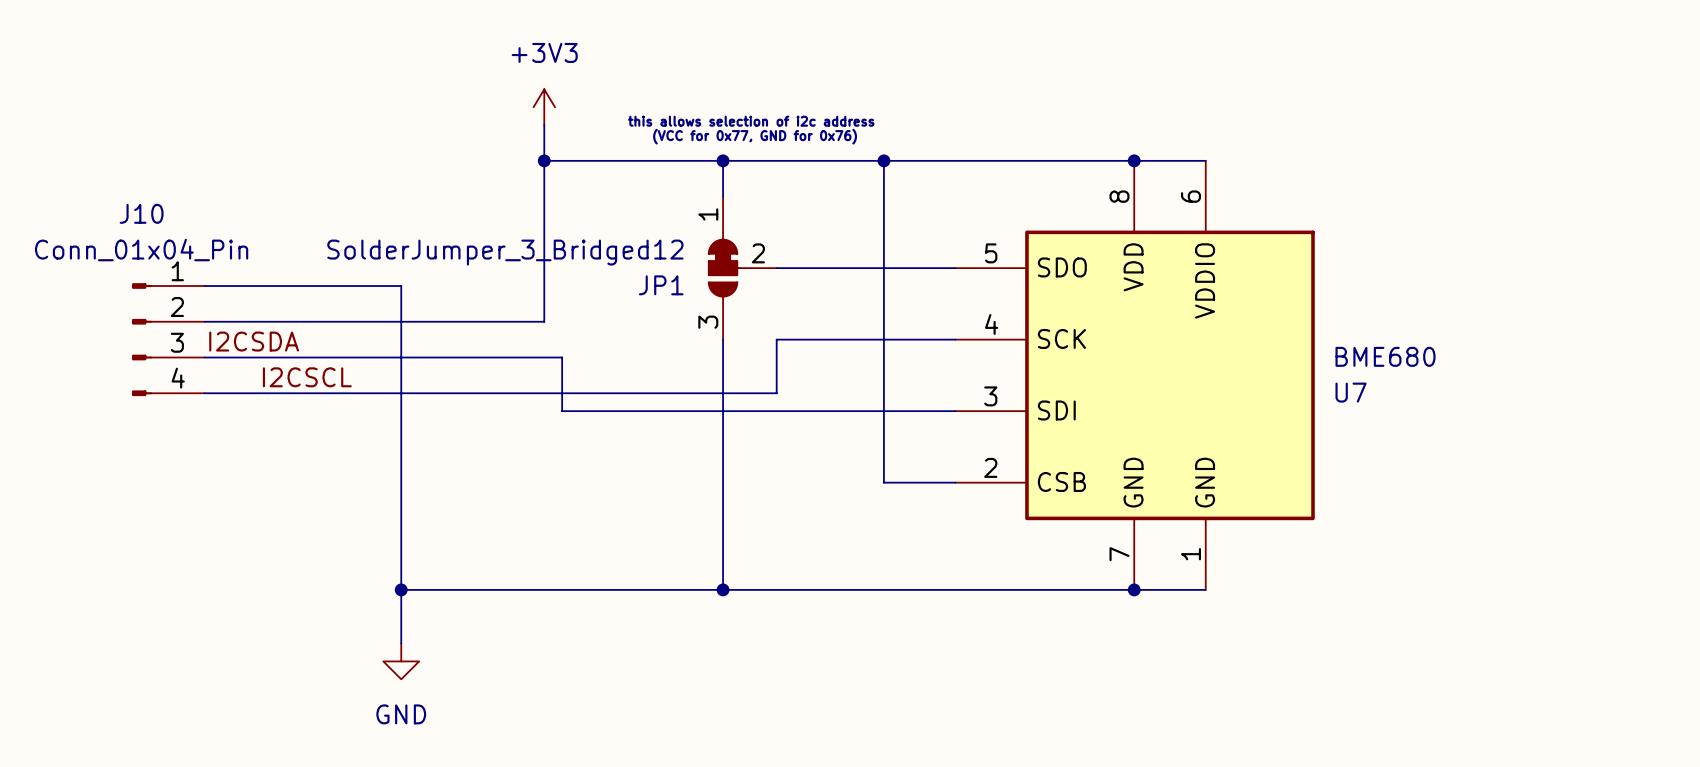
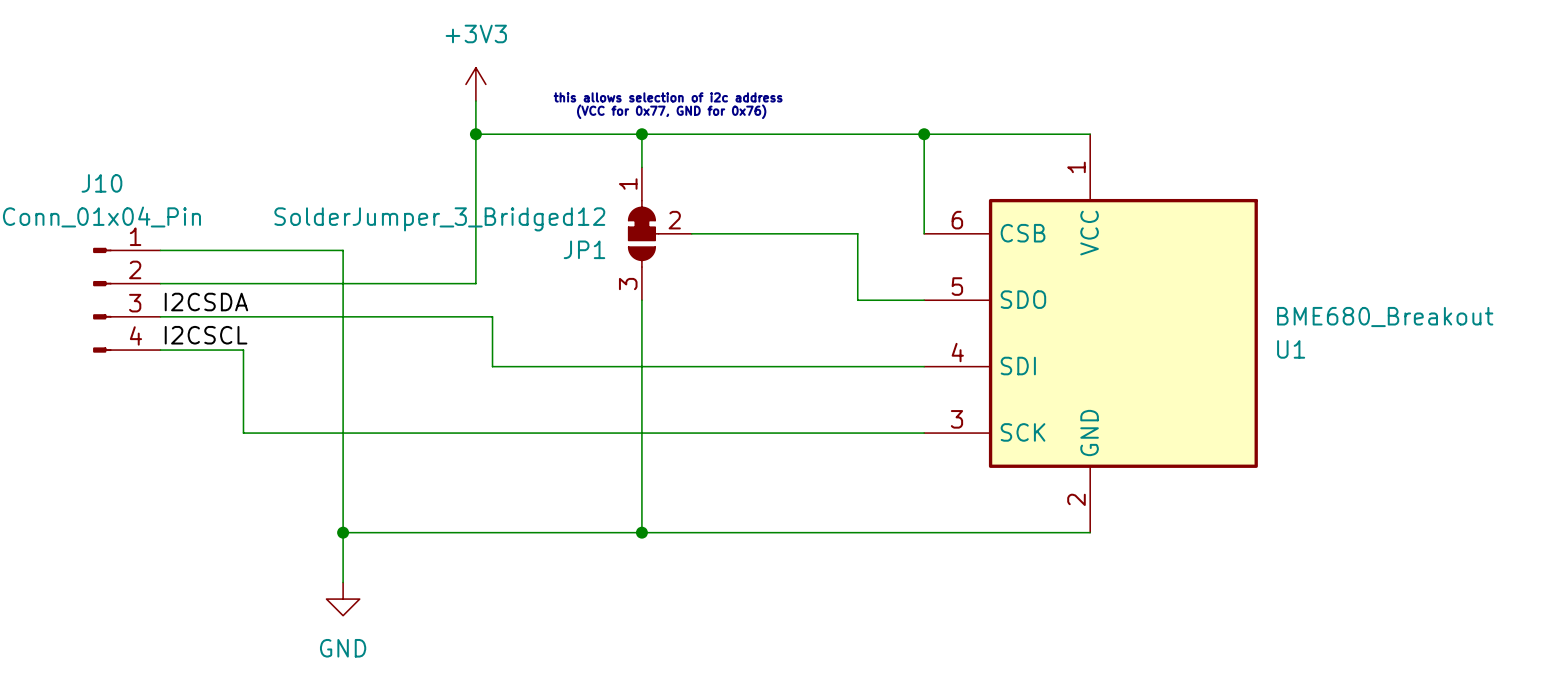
wire: (883, 160) (883, 482) -> none
junction: (883, 160) -> none
wire: none -> (924, 134) (924, 233)
junction: none -> (924, 134)
junction: (1134, 160) -> none
wire: none -> (857, 233) (857, 300) (924, 300)
wire: (955, 339) (776, 339) (776, 393) (293, 393) -> (791, 433) (243, 433) (243, 350)
U7: BME680 (1135, 375) -> none
U1: none -> BME680_Breakout (1091, 333)
label position: I2CSCL (307, 377) -> I2CSCL (206, 335)
junction: (1134, 589) -> none

